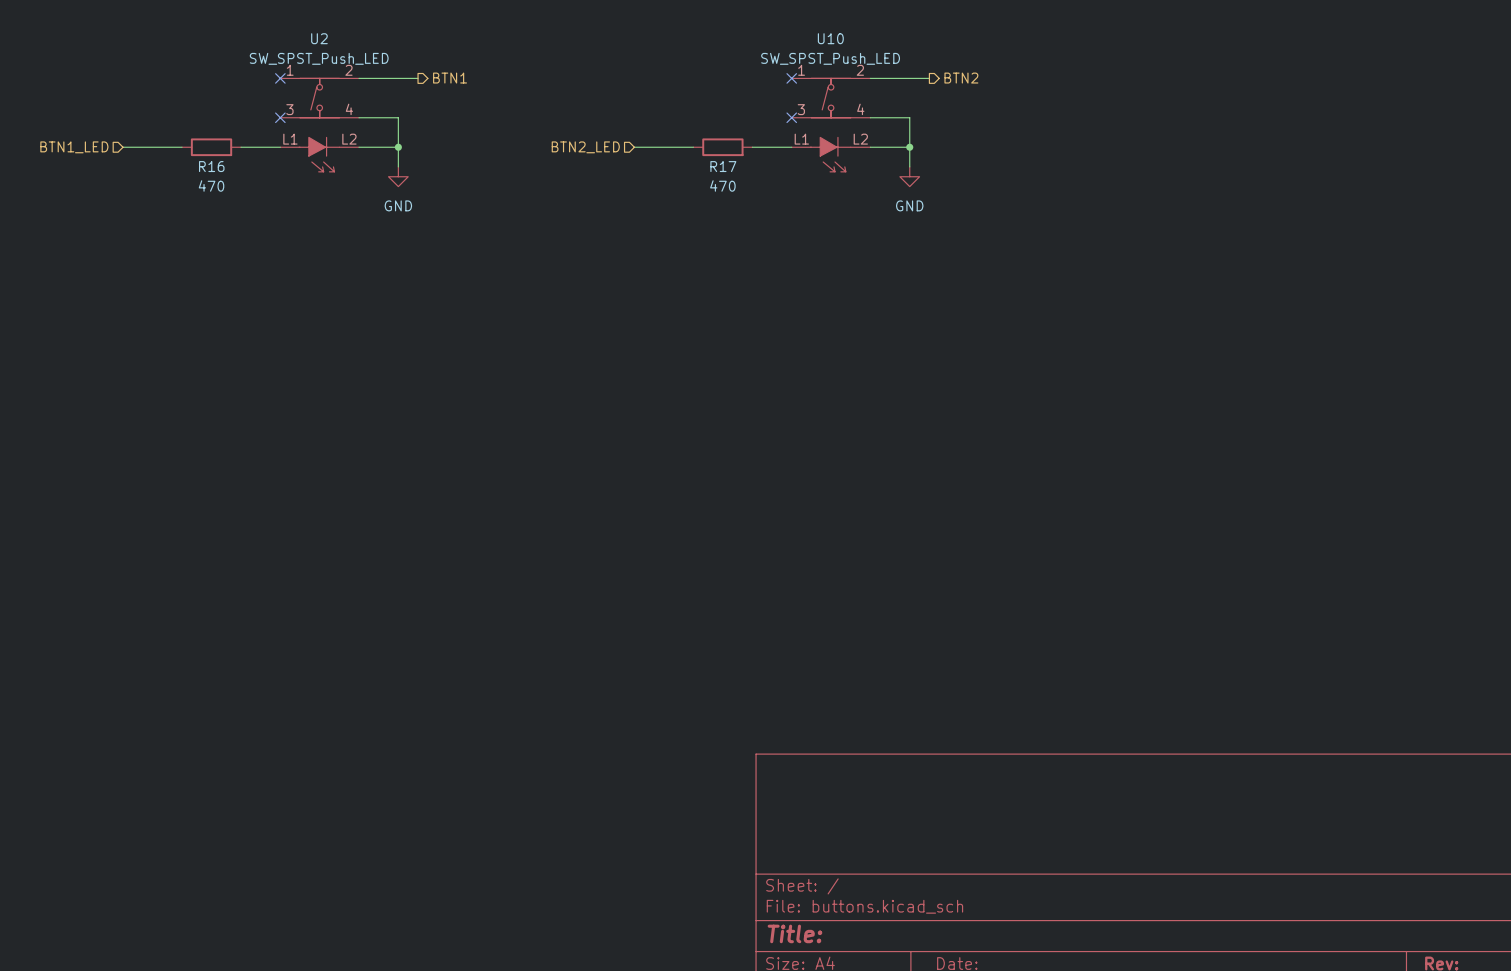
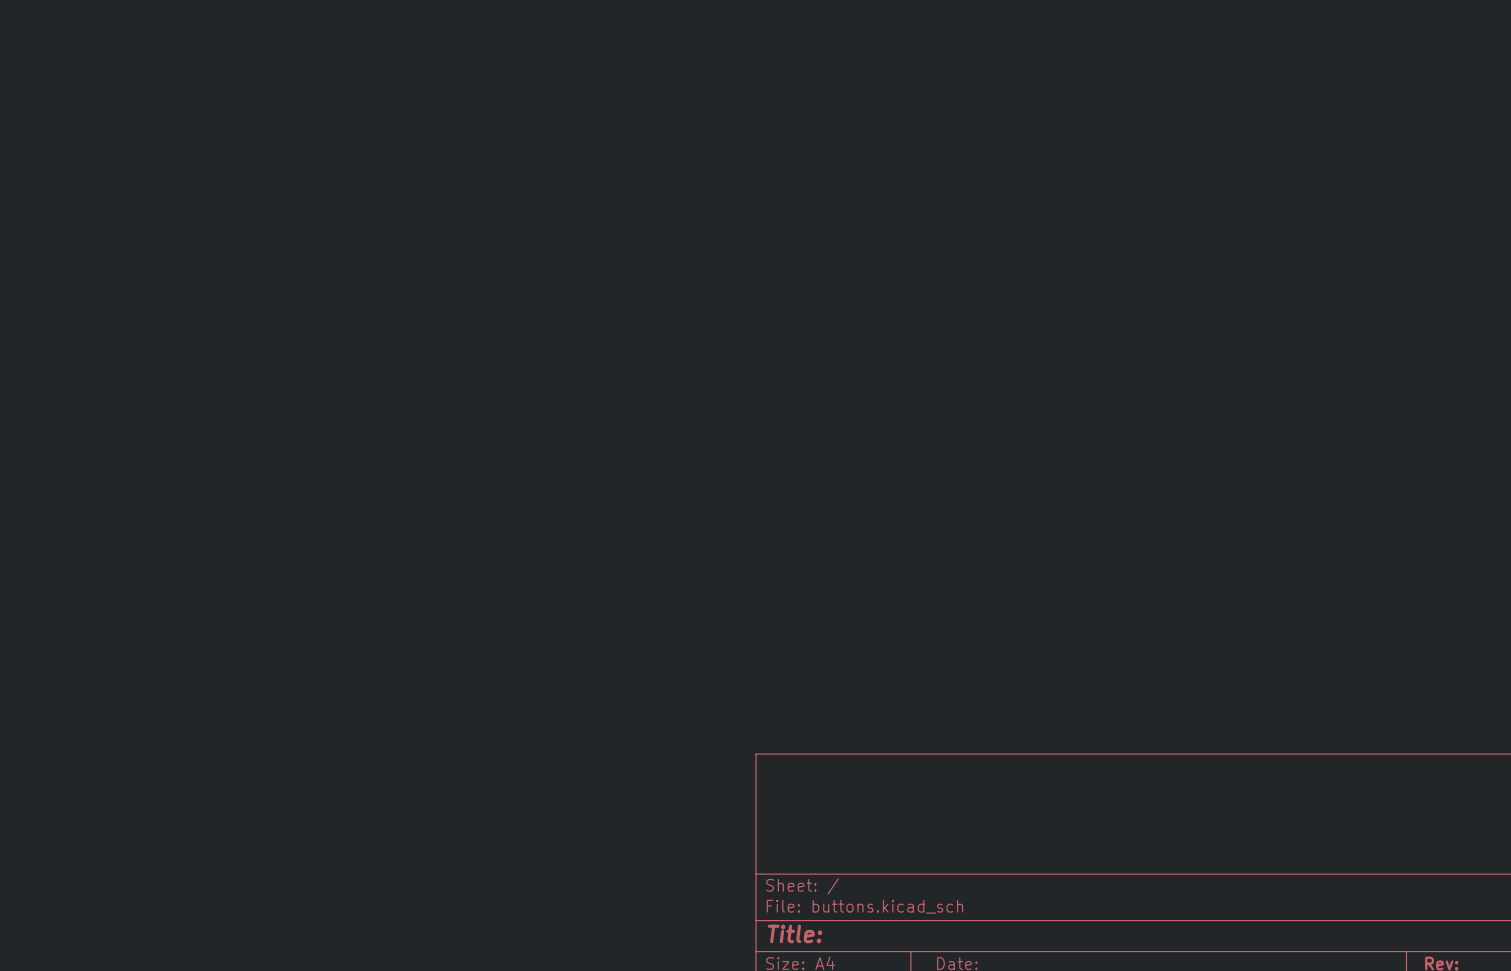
no-connect mark: (280, 78) -> none
wire: (359, 78) (418, 78) -> none
hierarchical label: BTN1 (450, 78) -> none
no-connect mark: (791, 78) -> none
wire: (870, 78) (929, 78) -> none
hierarchical label: BTN2 (961, 78) -> none
no-connect mark: (280, 117) -> none
wire: (359, 117) (398, 117) (398, 166) -> none
no-connect mark: (791, 117) -> none
wire: (870, 117) (909, 117) (909, 166) -> none
U2: SW_SPST_Push_LED (319, 125) -> none
U10: SW_SPST_Push_LED (831, 125) -> none
hierarchical label: BTN1_LED (74, 147) -> none
wire: (123, 147) (182, 147) -> none
R16: 470 (211, 147) -> none
wire: (241, 147) (280, 147) -> none
wire: (359, 147) (398, 147) -> none
junction: (398, 147) -> none
hierarchical label: BTN2_LED (585, 147) -> none
wire: (634, 147) (693, 147) -> none
R17: 470 (722, 147) -> none
wire: (752, 147) (791, 147) -> none
wire: (870, 147) (909, 147) -> none
junction: (909, 147) -> none
power symbol: GND (398, 176) -> none
power symbol: GND (909, 176) -> none

